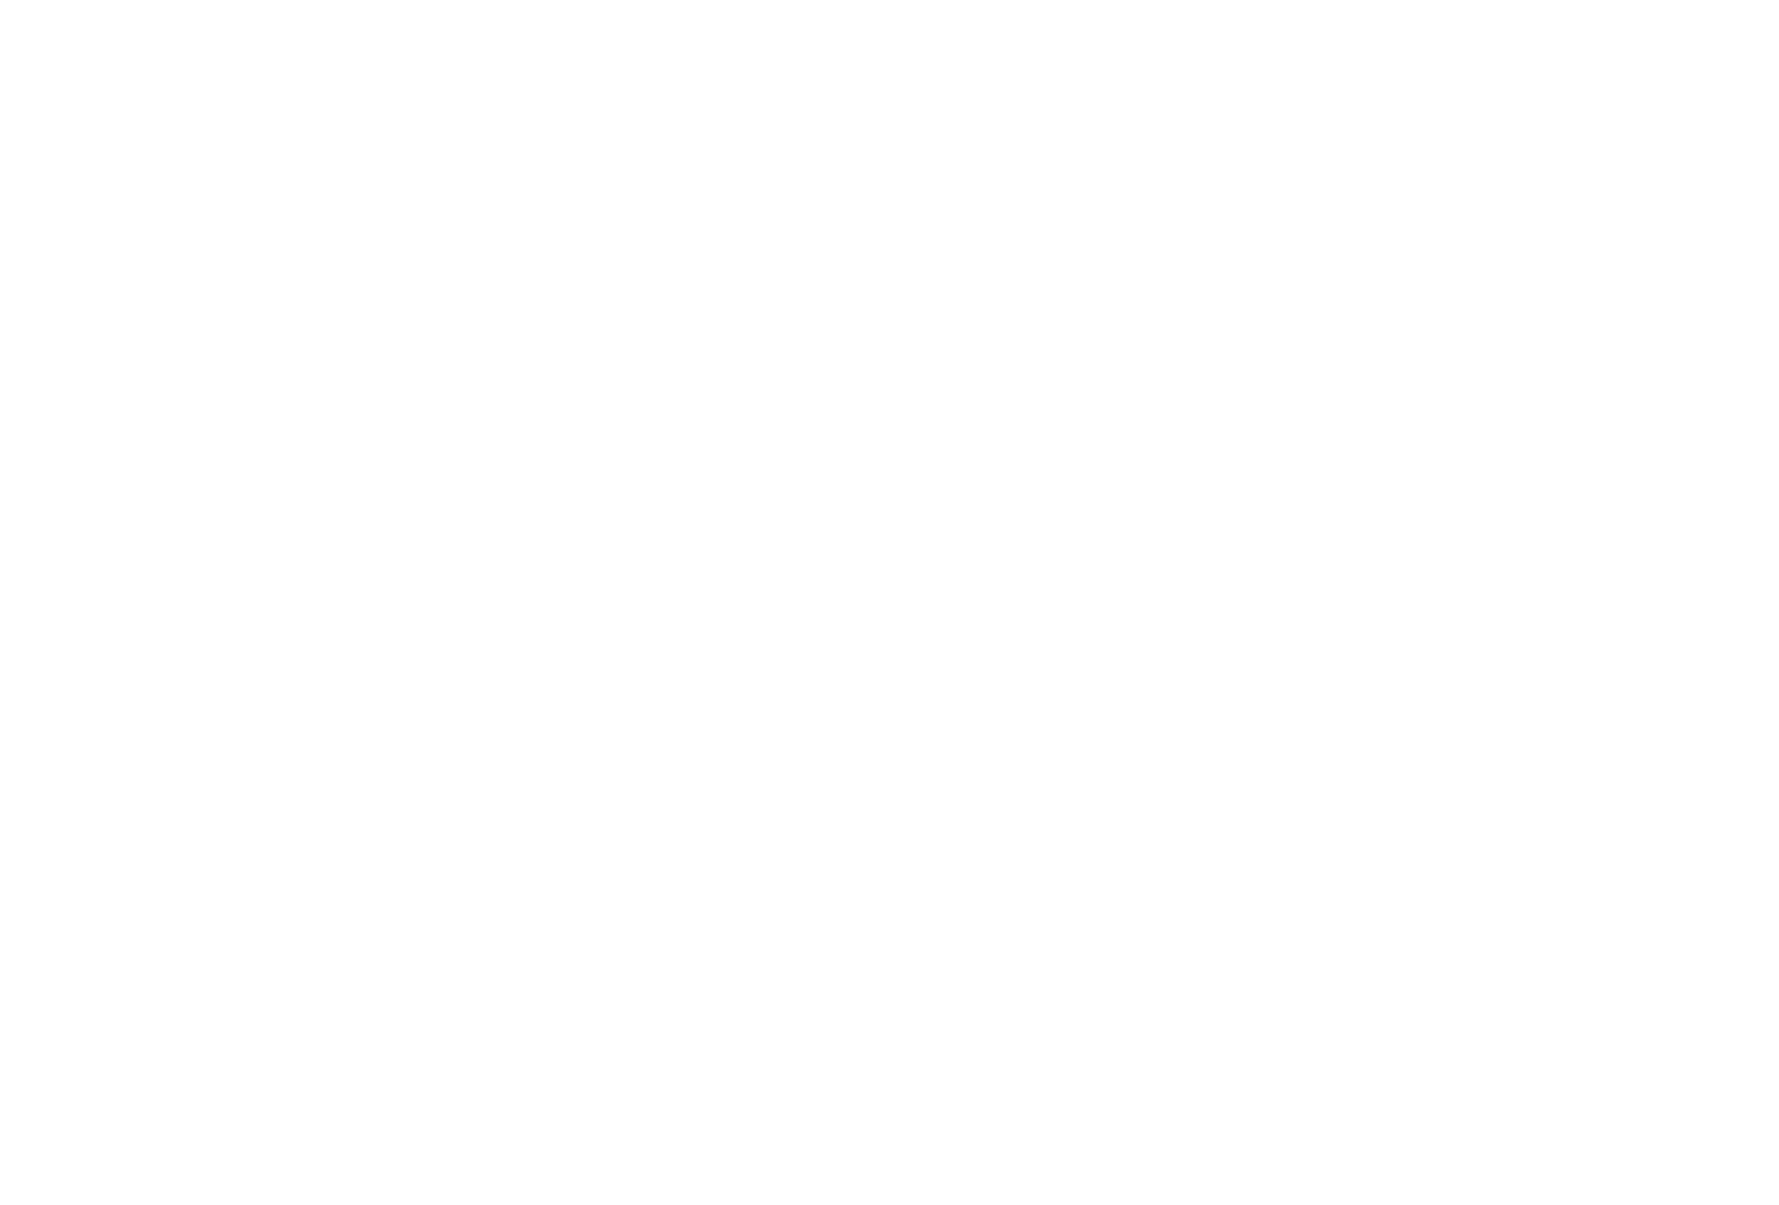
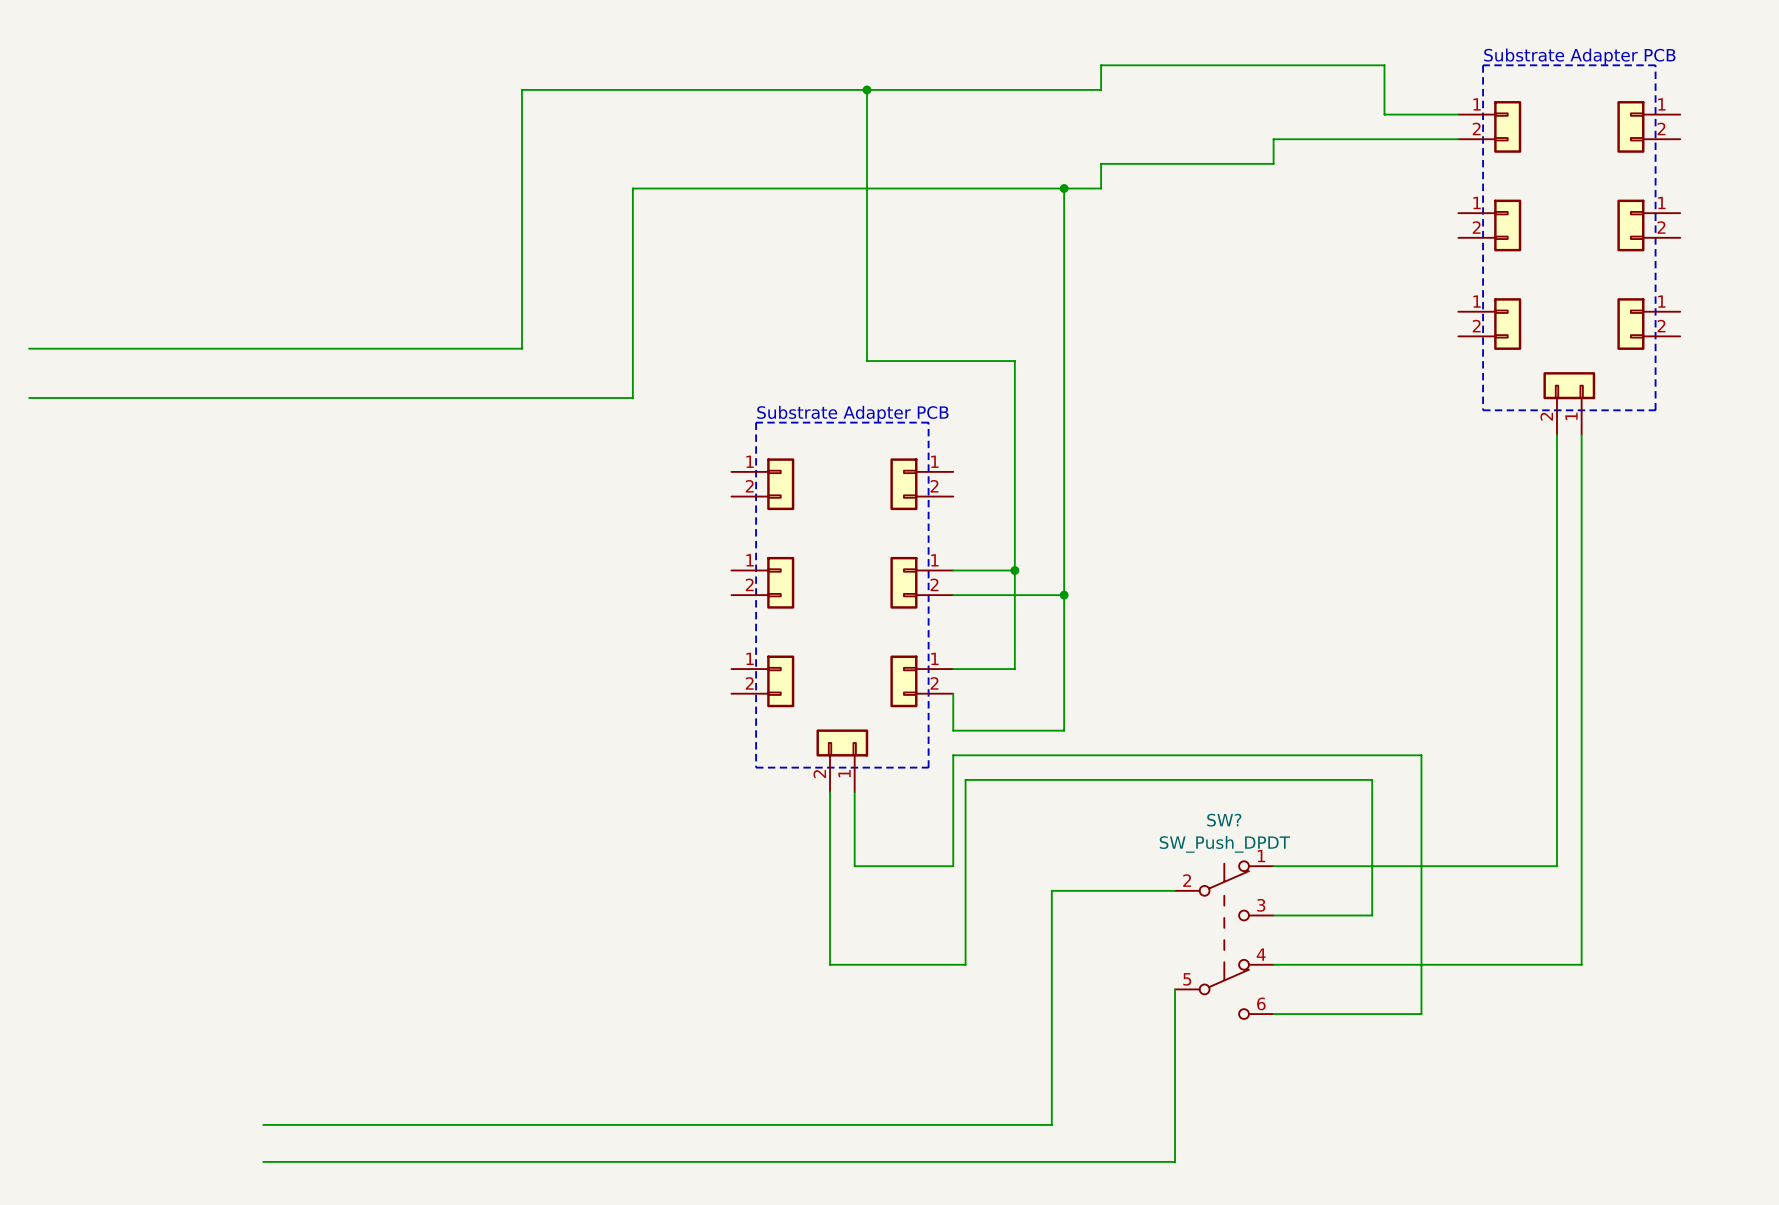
text: none -> Substrate Adapter PCB (1579, 56)
line: none -> (1483, 65) (1483, 410) (1655, 410) (1655, 65) (1483, 65)
wire: none -> (866, 89) (866, 361) (1014, 361) (1014, 669) (953, 669)
junction: none -> (866, 89)
wire: none -> (1458, 114) (1384, 114) (1384, 65) (1101, 65) (1101, 89) (521, 89) (521, 348) (29, 348)
part: none -> (1489, 126)
part: none -> (1648, 126)
wire: none -> (1458, 139) (1273, 139) (1273, 163) (1101, 163) (1101, 188) (632, 188) (632, 397) (29, 397)
wire: none -> (1064, 188) (1064, 730) (953, 730) (953, 693)
junction: none -> (1064, 188)
part: none -> (1489, 225)
part: none -> (1648, 225)
part: none -> (1489, 324)
part: none -> (1648, 324)
part: none -> (1569, 403)
text: none -> Substrate Adapter PCB (852, 414)
line: none -> (756, 422) (756, 767) (928, 767) (928, 422) (756, 422)
wire: none -> (1556, 434) (1556, 866) (1273, 866)
wire: none -> (1581, 434) (1581, 964) (1273, 964)
part: none -> (762, 484)
part: none -> (921, 484)
wire: none -> (953, 570) (1014, 570)
junction: none -> (1014, 570)
part: none -> (762, 582)
part: none -> (921, 582)
wire: none -> (953, 595) (1064, 595)
junction: none -> (1064, 595)
part: none -> (762, 681)
part: none -> (921, 681)
part: none -> (842, 760)
wire: none -> (830, 792) (830, 964) (965, 964) (965, 779) (1372, 779) (1372, 915) (1273, 915)
wire: none -> (854, 792) (854, 866) (953, 866) (953, 755) (1421, 755) (1421, 1014) (1273, 1014)
wire: none -> (1175, 890) (1051, 890) (1051, 1124) (263, 1124)
SW?: none -> SW_Push_DPDT (1224, 940)
wire: none -> (1175, 989) (1175, 1161) (263, 1161)

